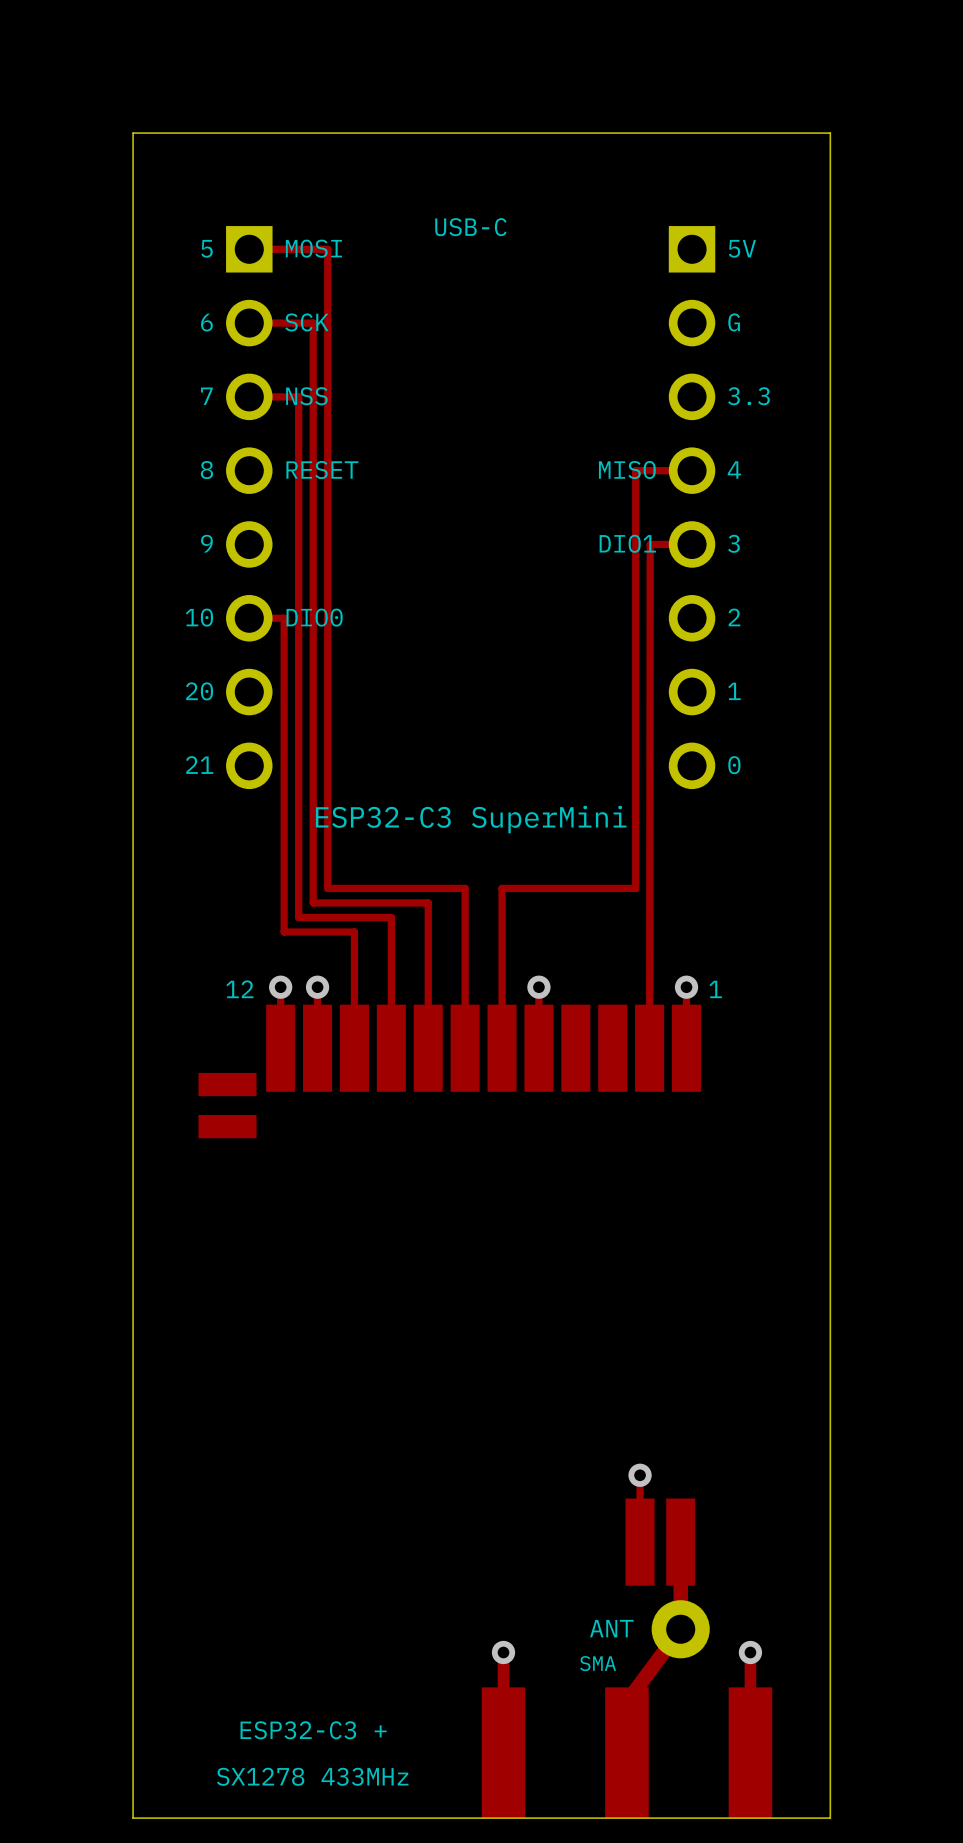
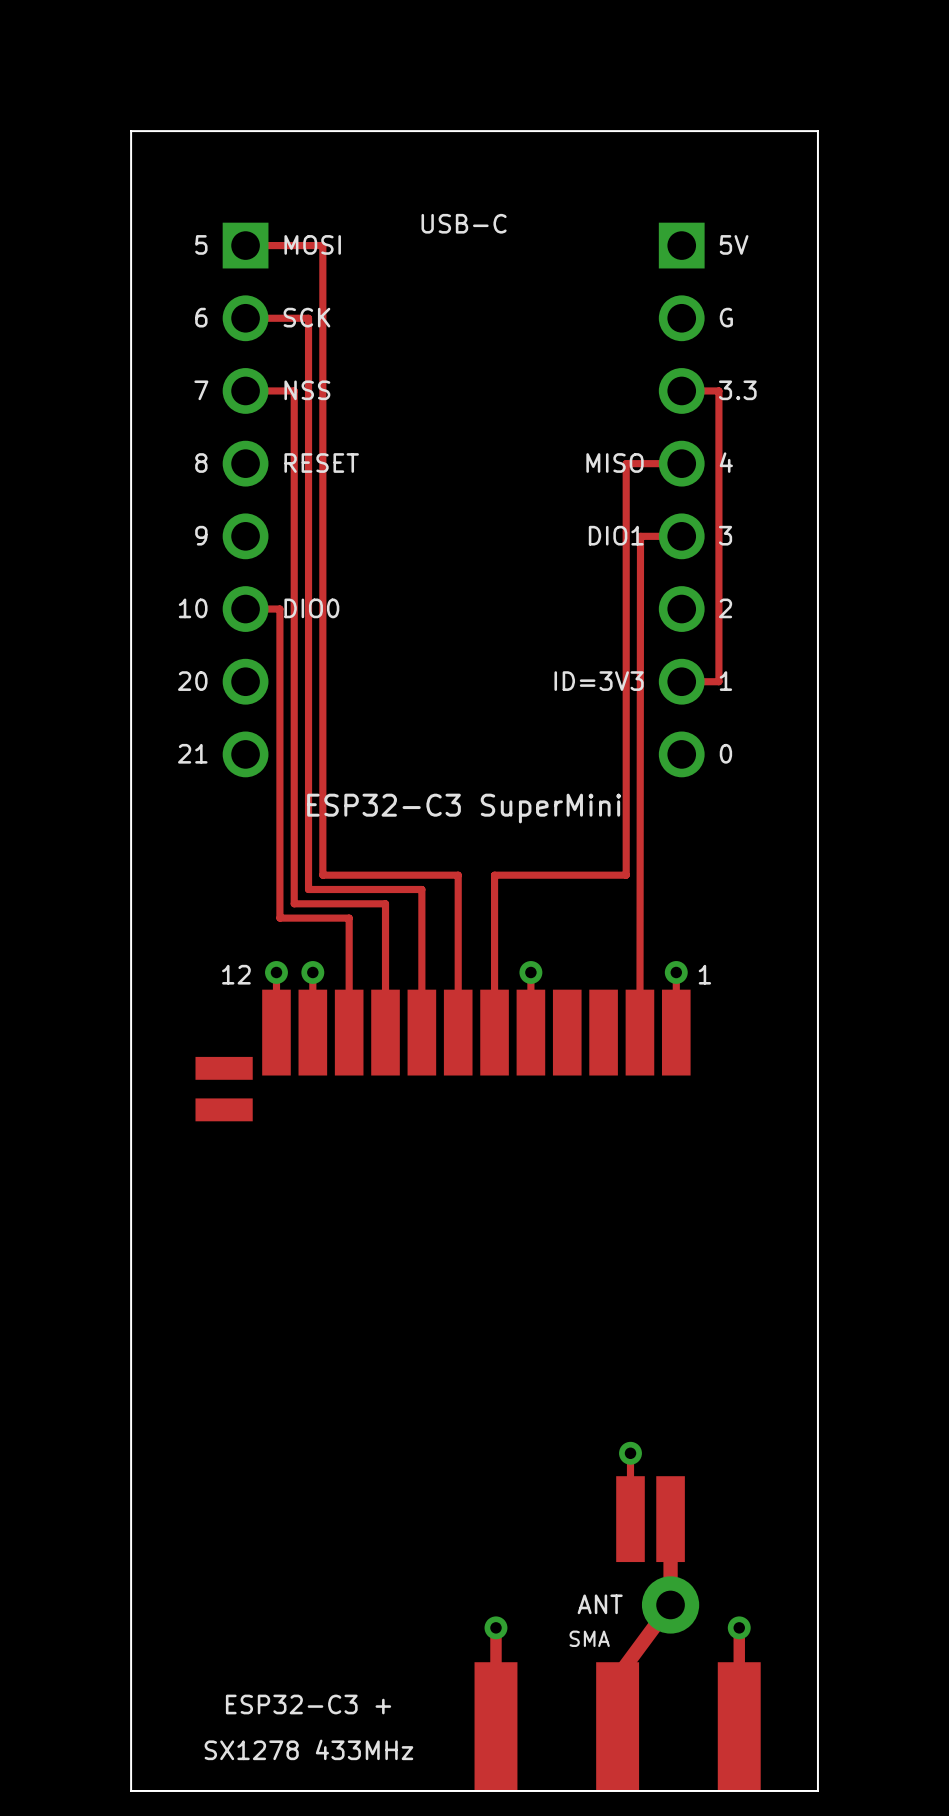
track: none -> (681, 390) (718, 390) (718, 681) (681, 681)
text: none -> ID=3V3 (599, 681)

